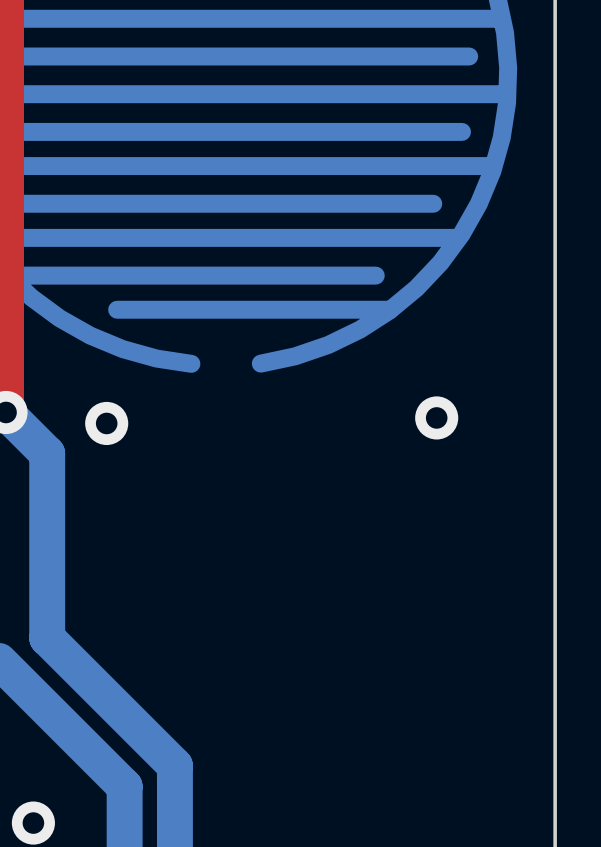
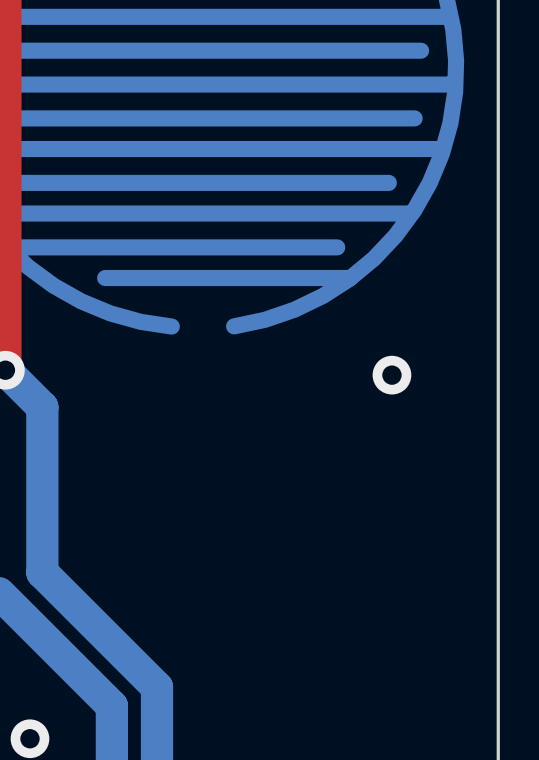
via: (106, 423) -> none

